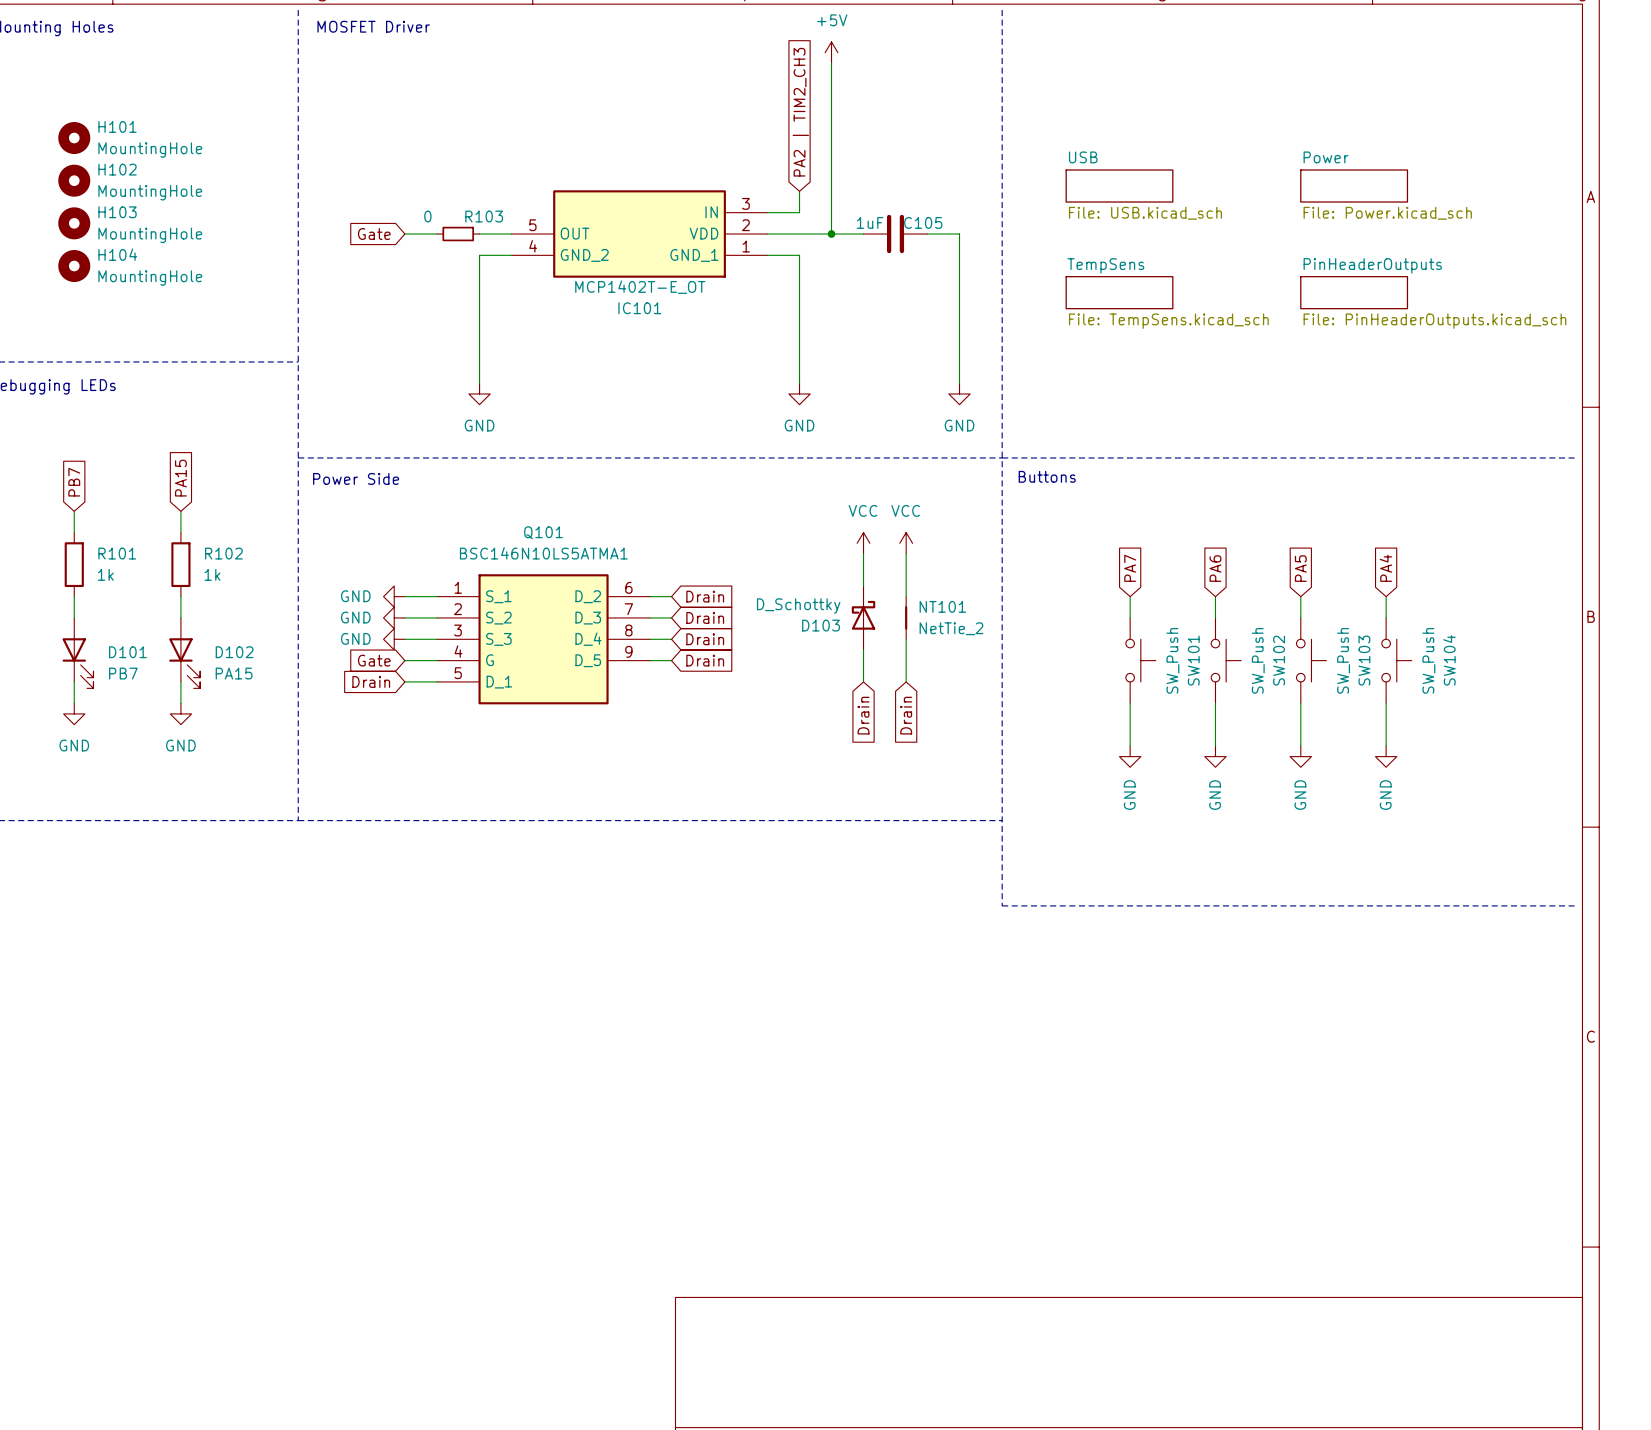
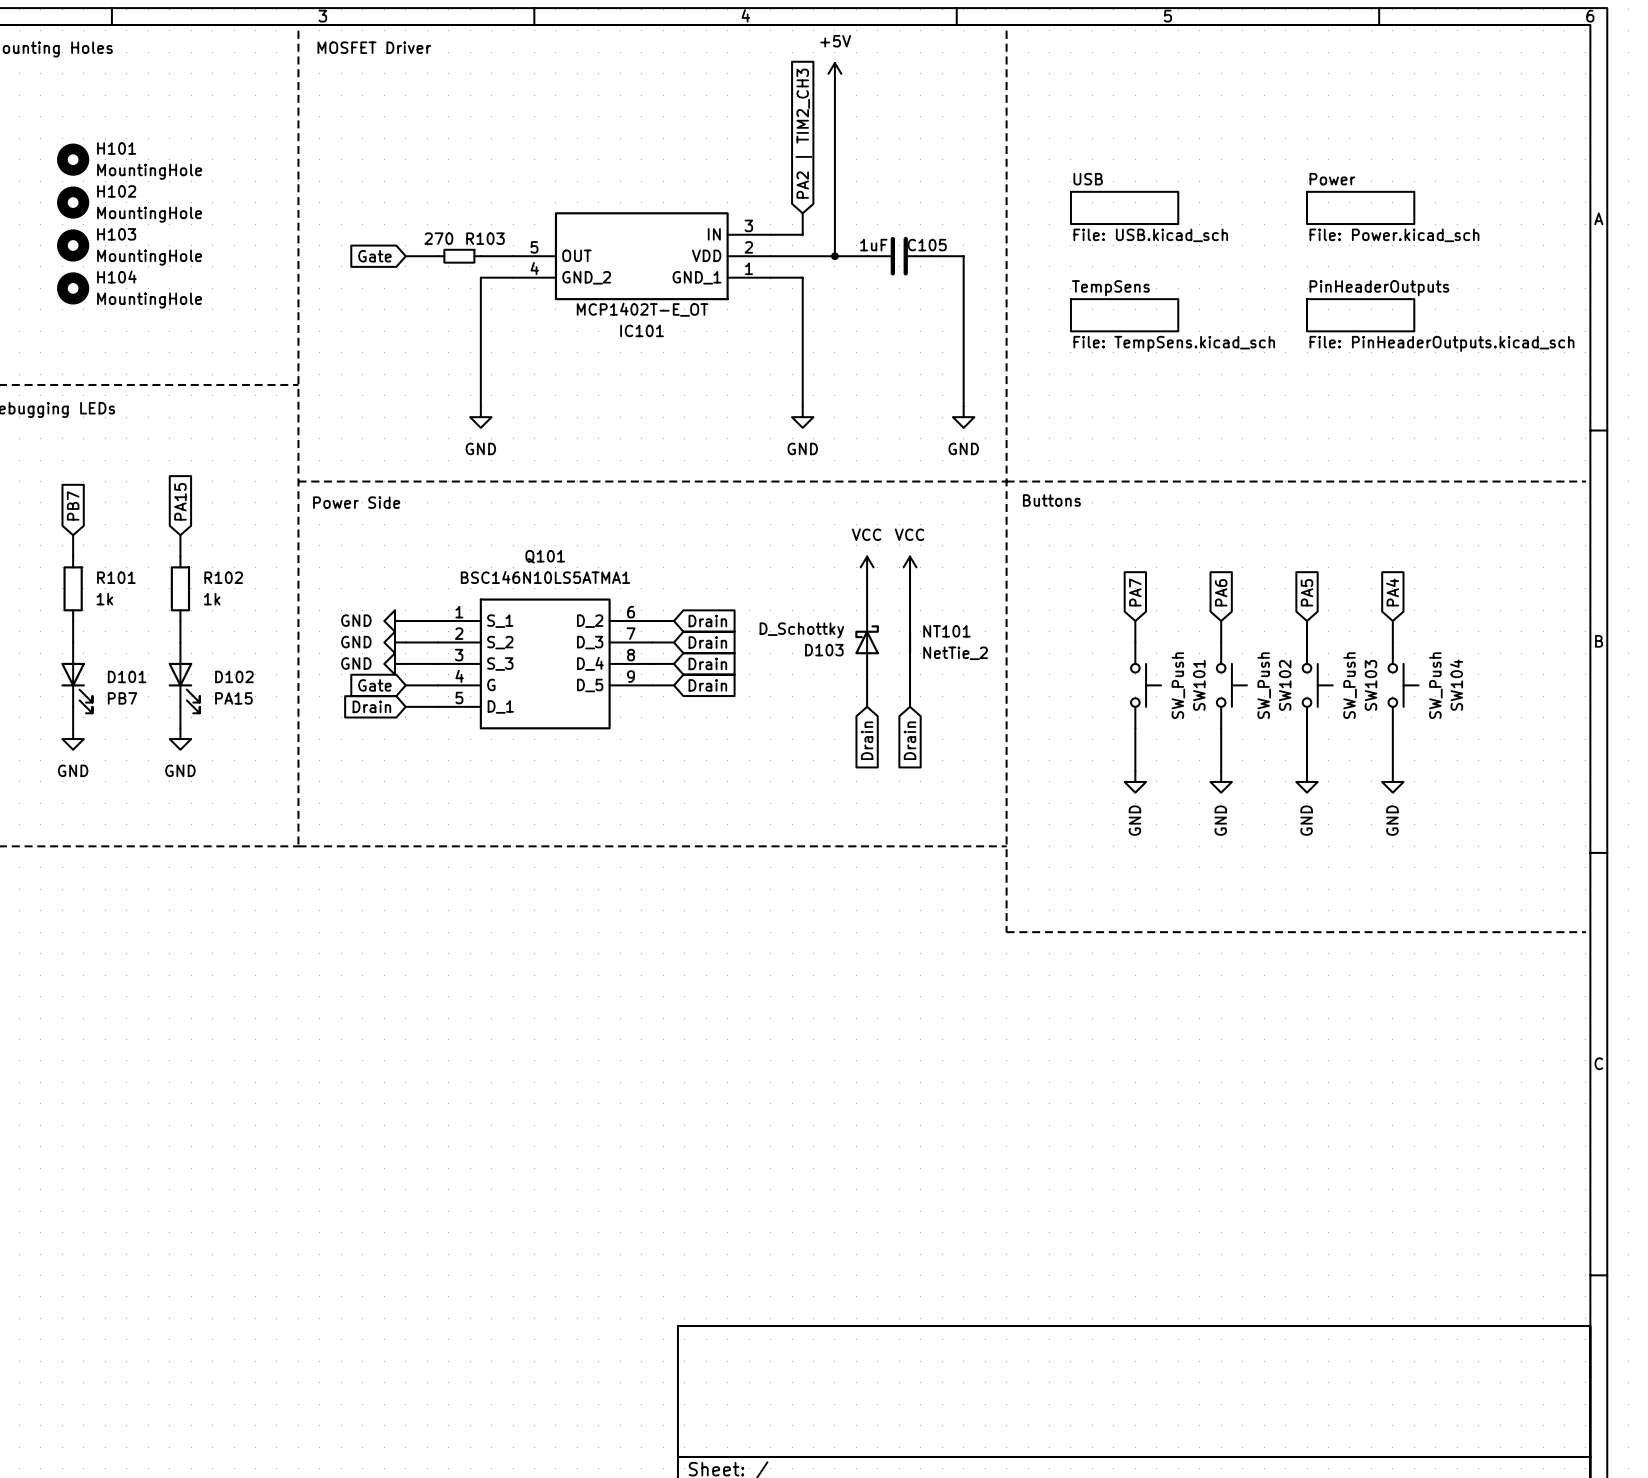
R103 value: 0 (427, 216) -> 270 (438, 238)

